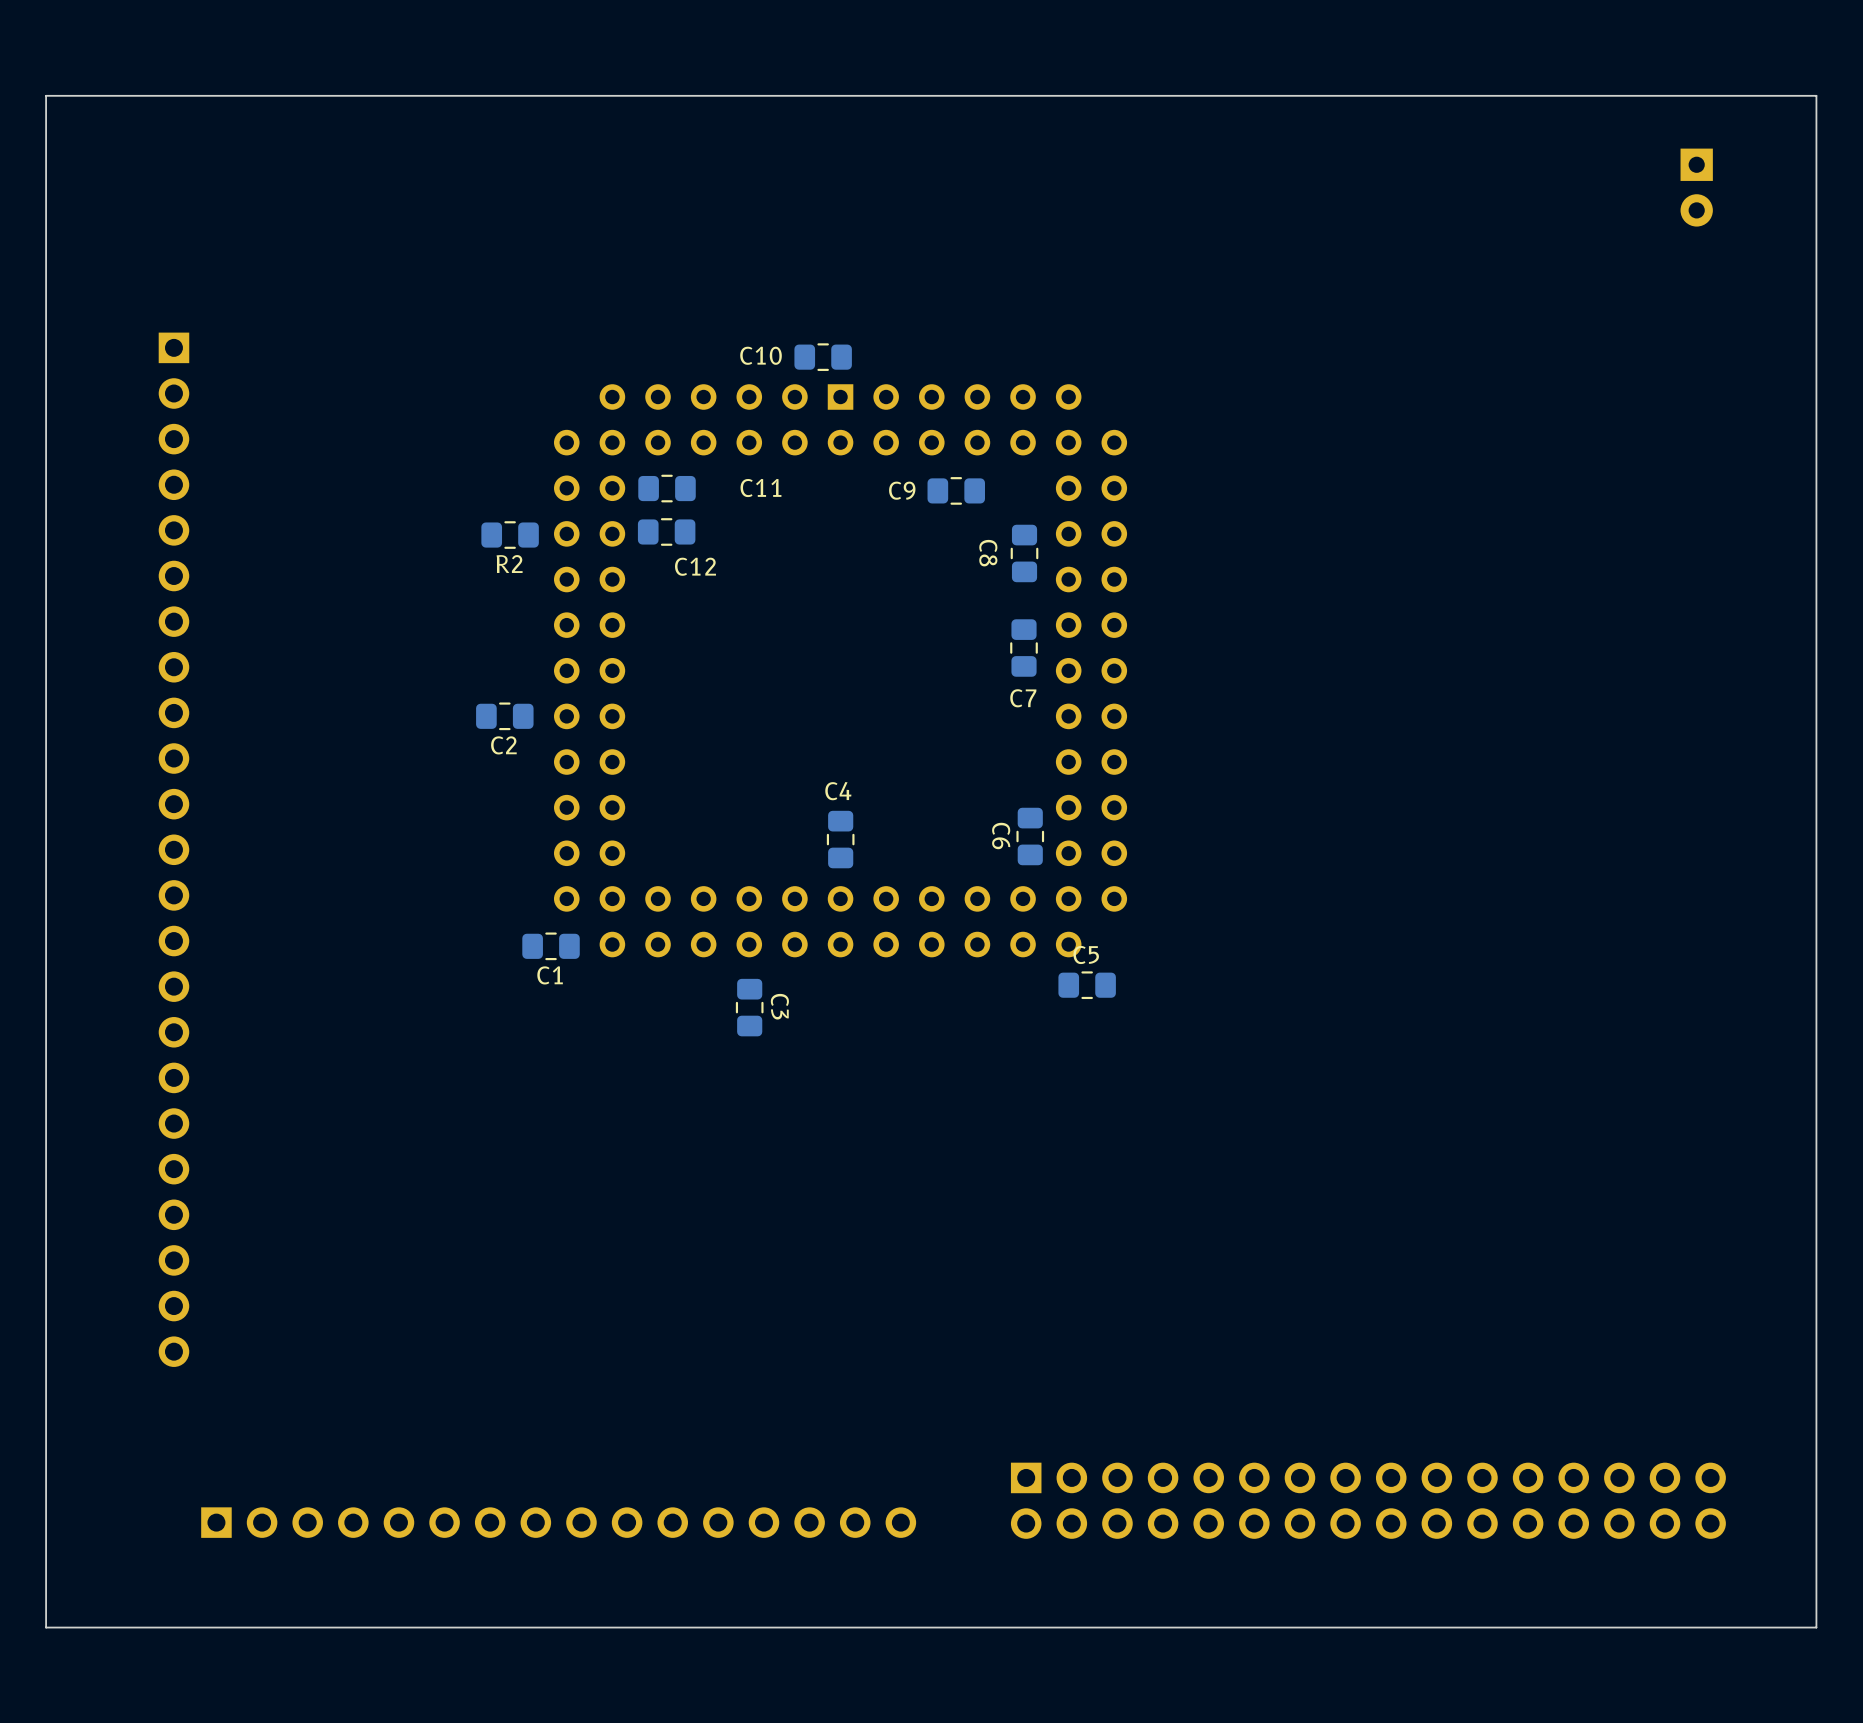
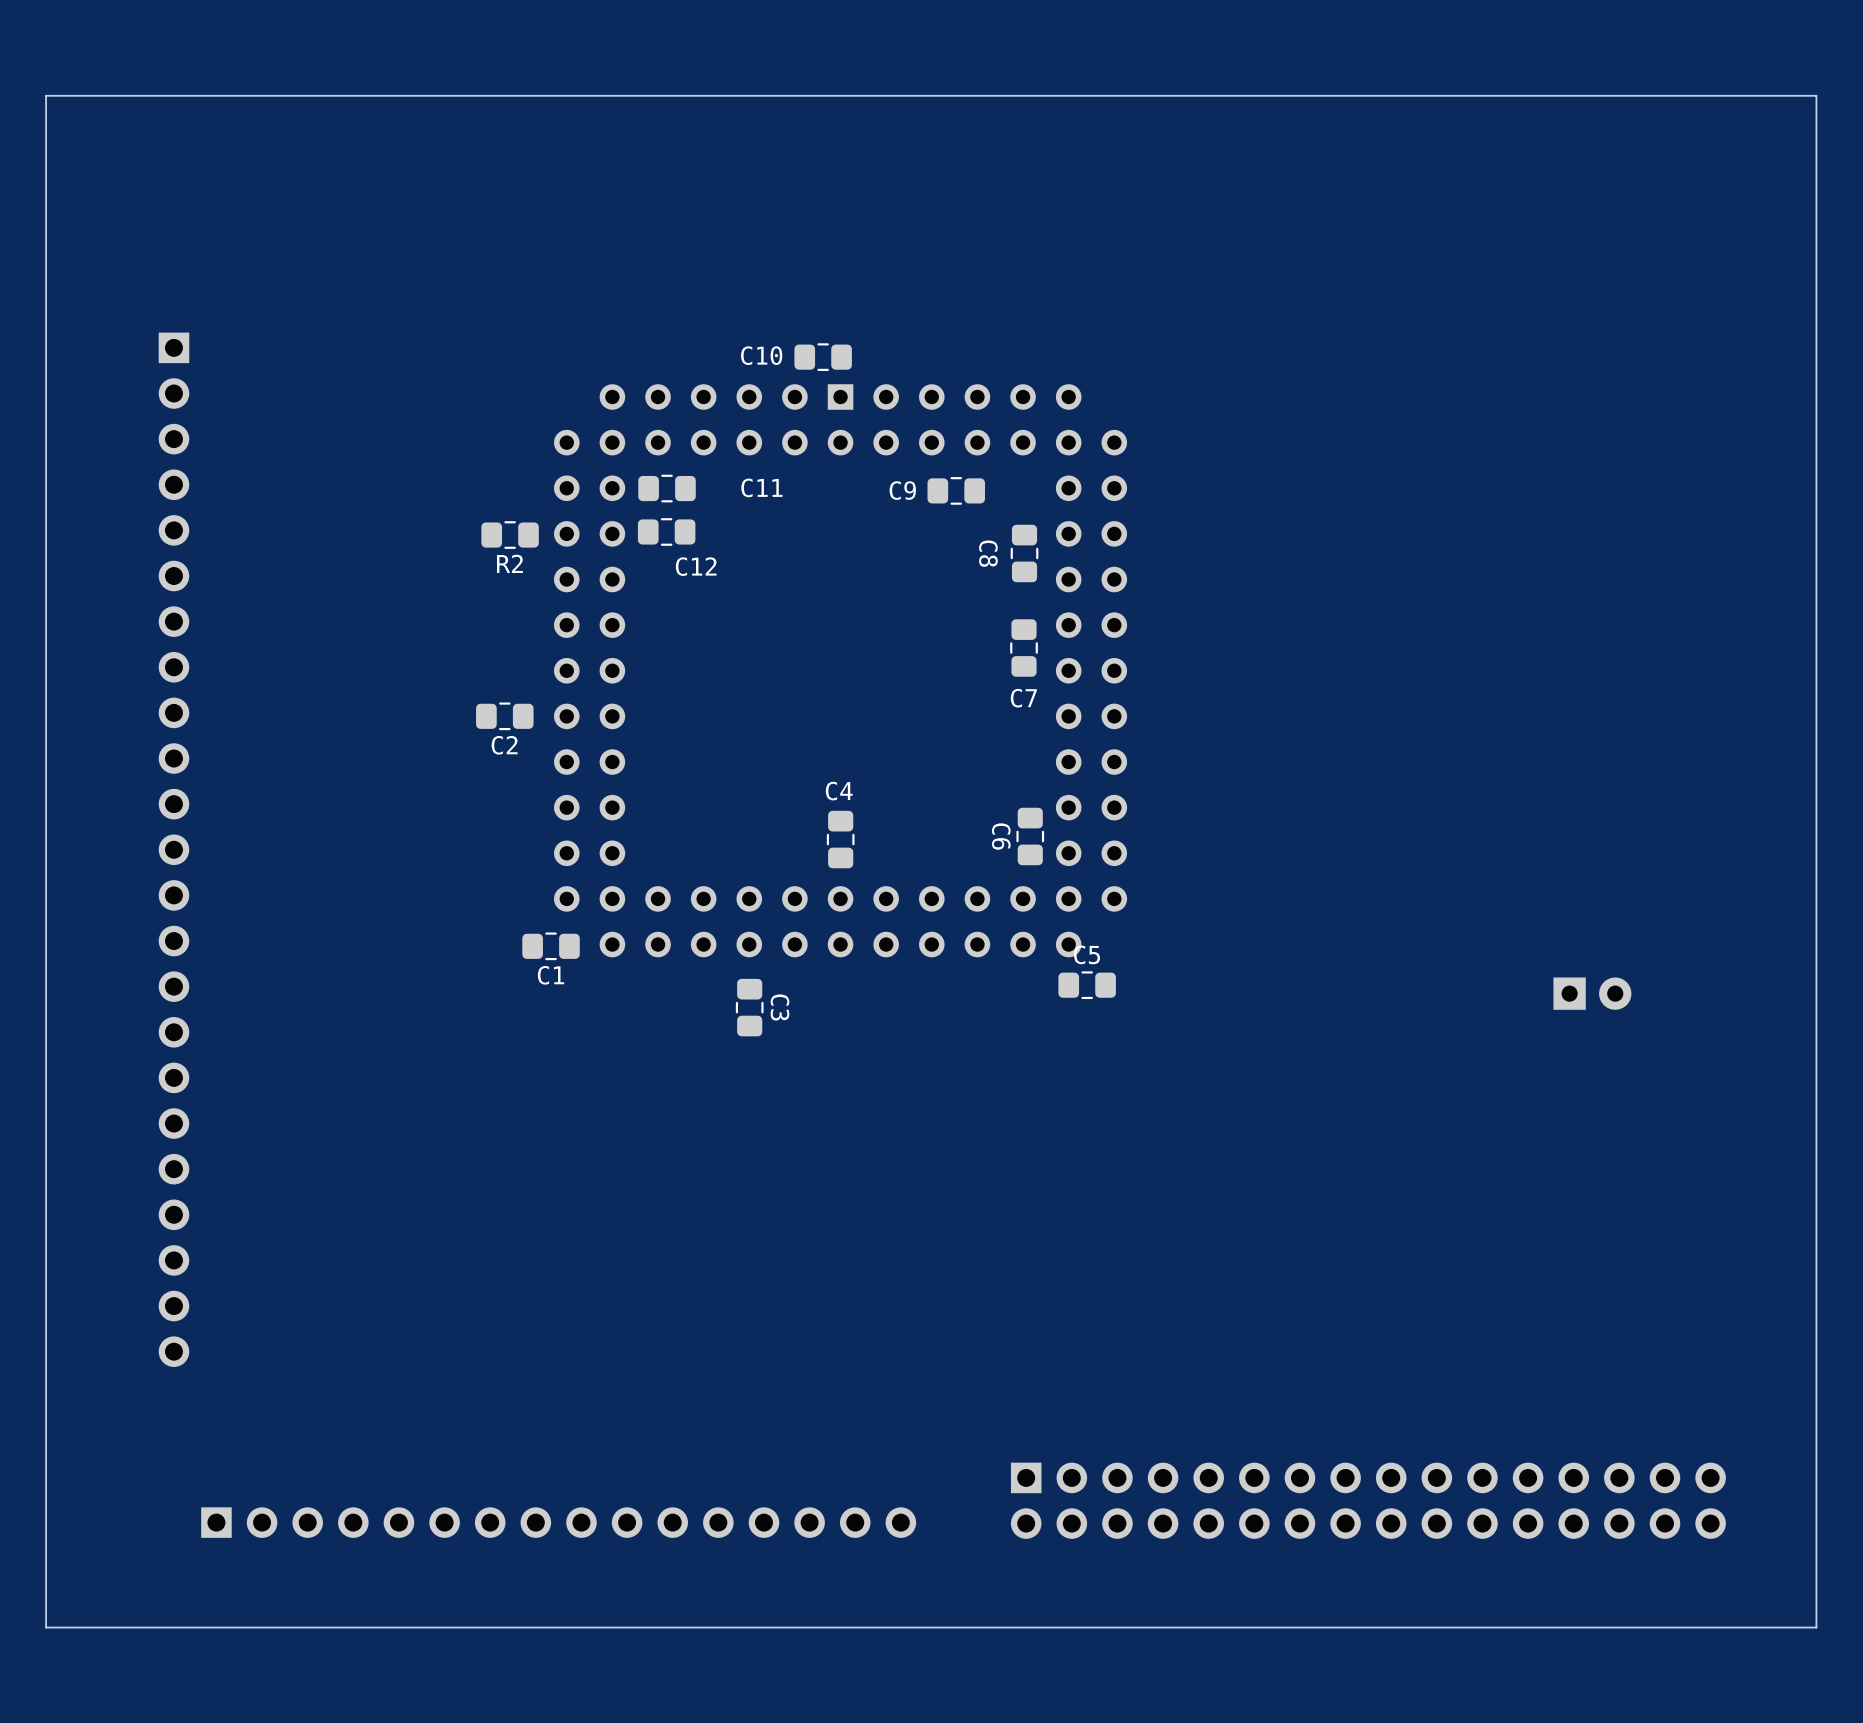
part: (1696, 187) -> none
part: none -> (1592, 993)

